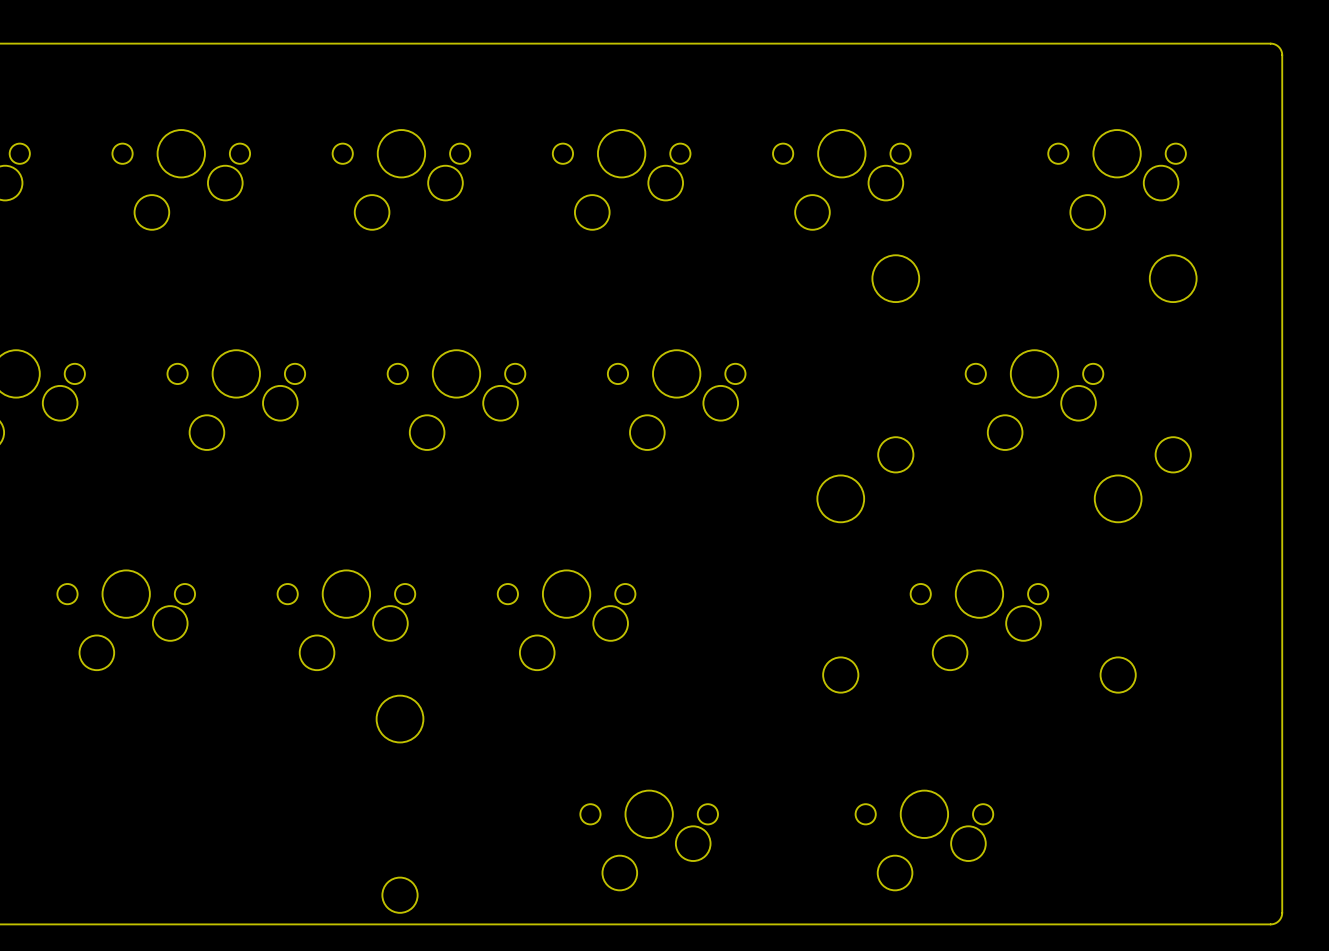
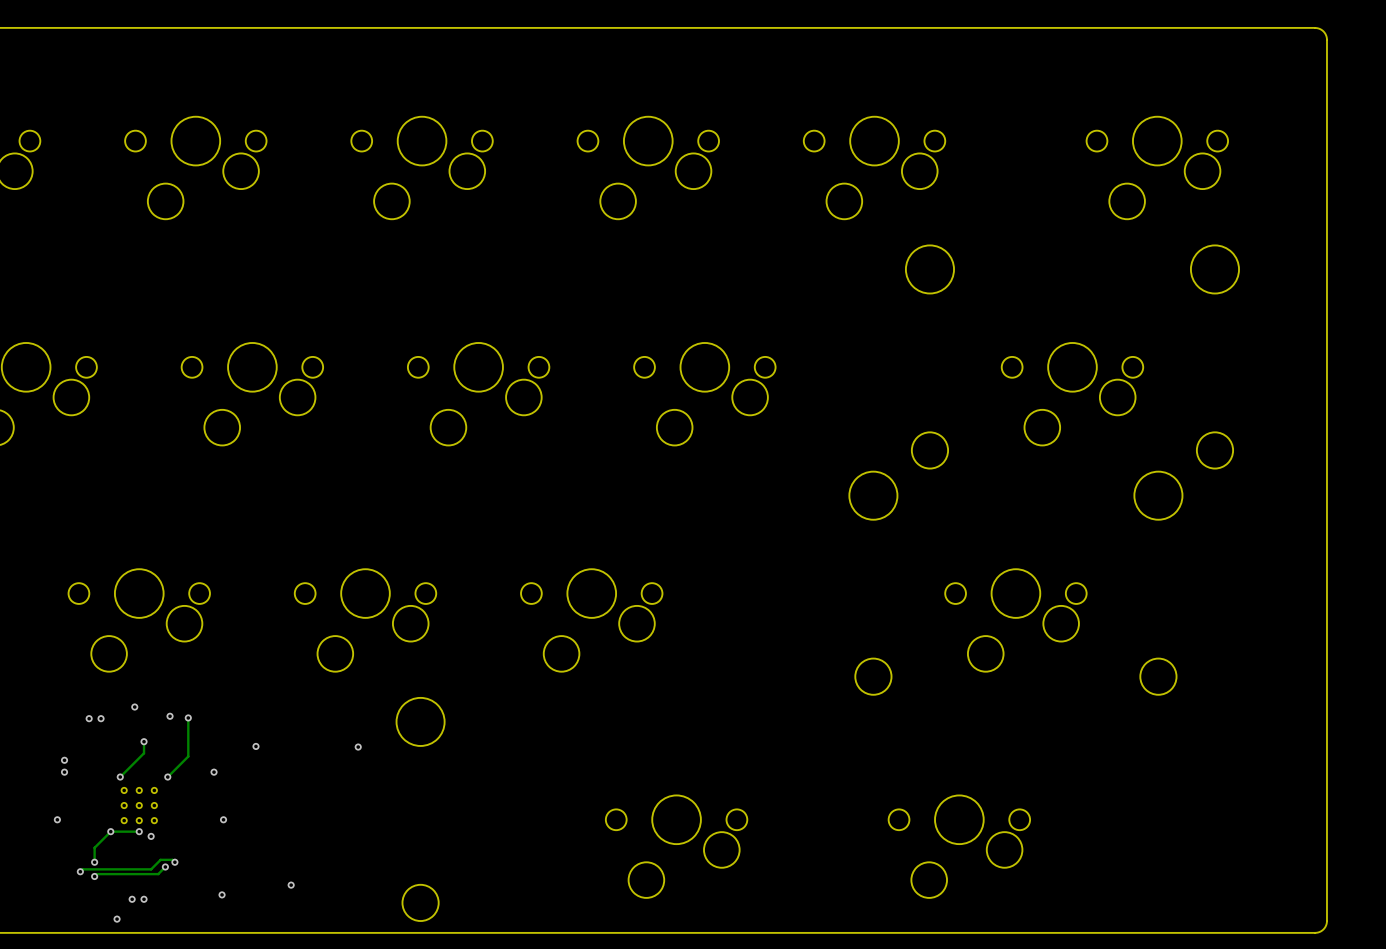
via: none -> (134, 707)
via: none -> (170, 716)
via: none -> (89, 718)
via: none -> (101, 718)
track: none -> (188, 717) (188, 756) (167, 777)
via: none -> (188, 717)
track: none -> (144, 741) (144, 753) (120, 777)
via: none -> (144, 741)
via: none -> (255, 746)
via: none -> (358, 747)
via: none -> (64, 760)
via: none -> (64, 772)
via: none -> (214, 772)
via: none -> (120, 777)
via: none -> (167, 777)
part: none -> (139, 805)
via: none -> (57, 819)
via: none -> (223, 819)
via: none -> (110, 831)
track: none -> (139, 831) (110, 831) (94, 847) (94, 862)
via: none -> (139, 831)
via: none -> (151, 836)
via: none -> (94, 862)
track: none -> (174, 862) (172, 859) (160, 859) (151, 869) (82, 869) (80, 871)
via: none -> (174, 862)
track: none -> (165, 866) (158, 874) (96, 874) (94, 876)
via: none -> (165, 866)
via: none -> (80, 871)
via: none -> (94, 876)
via: none -> (291, 885)
via: none -> (222, 894)
via: none -> (132, 899)
via: none -> (144, 899)
via: none -> (117, 919)

